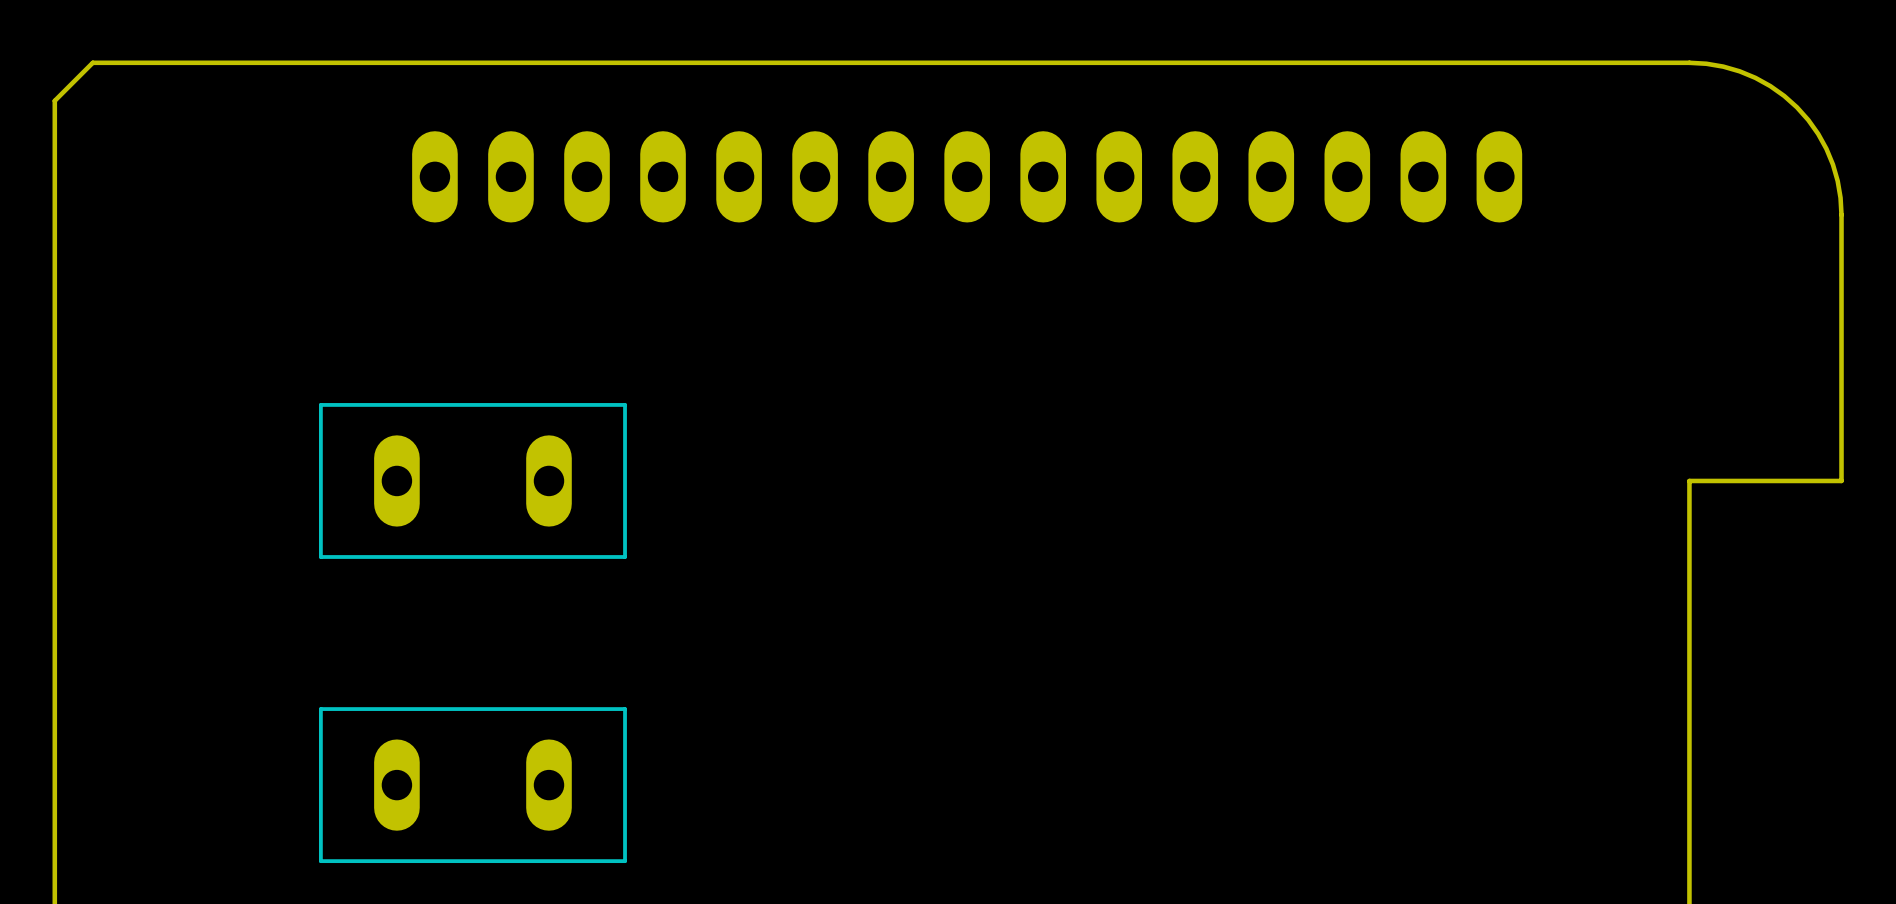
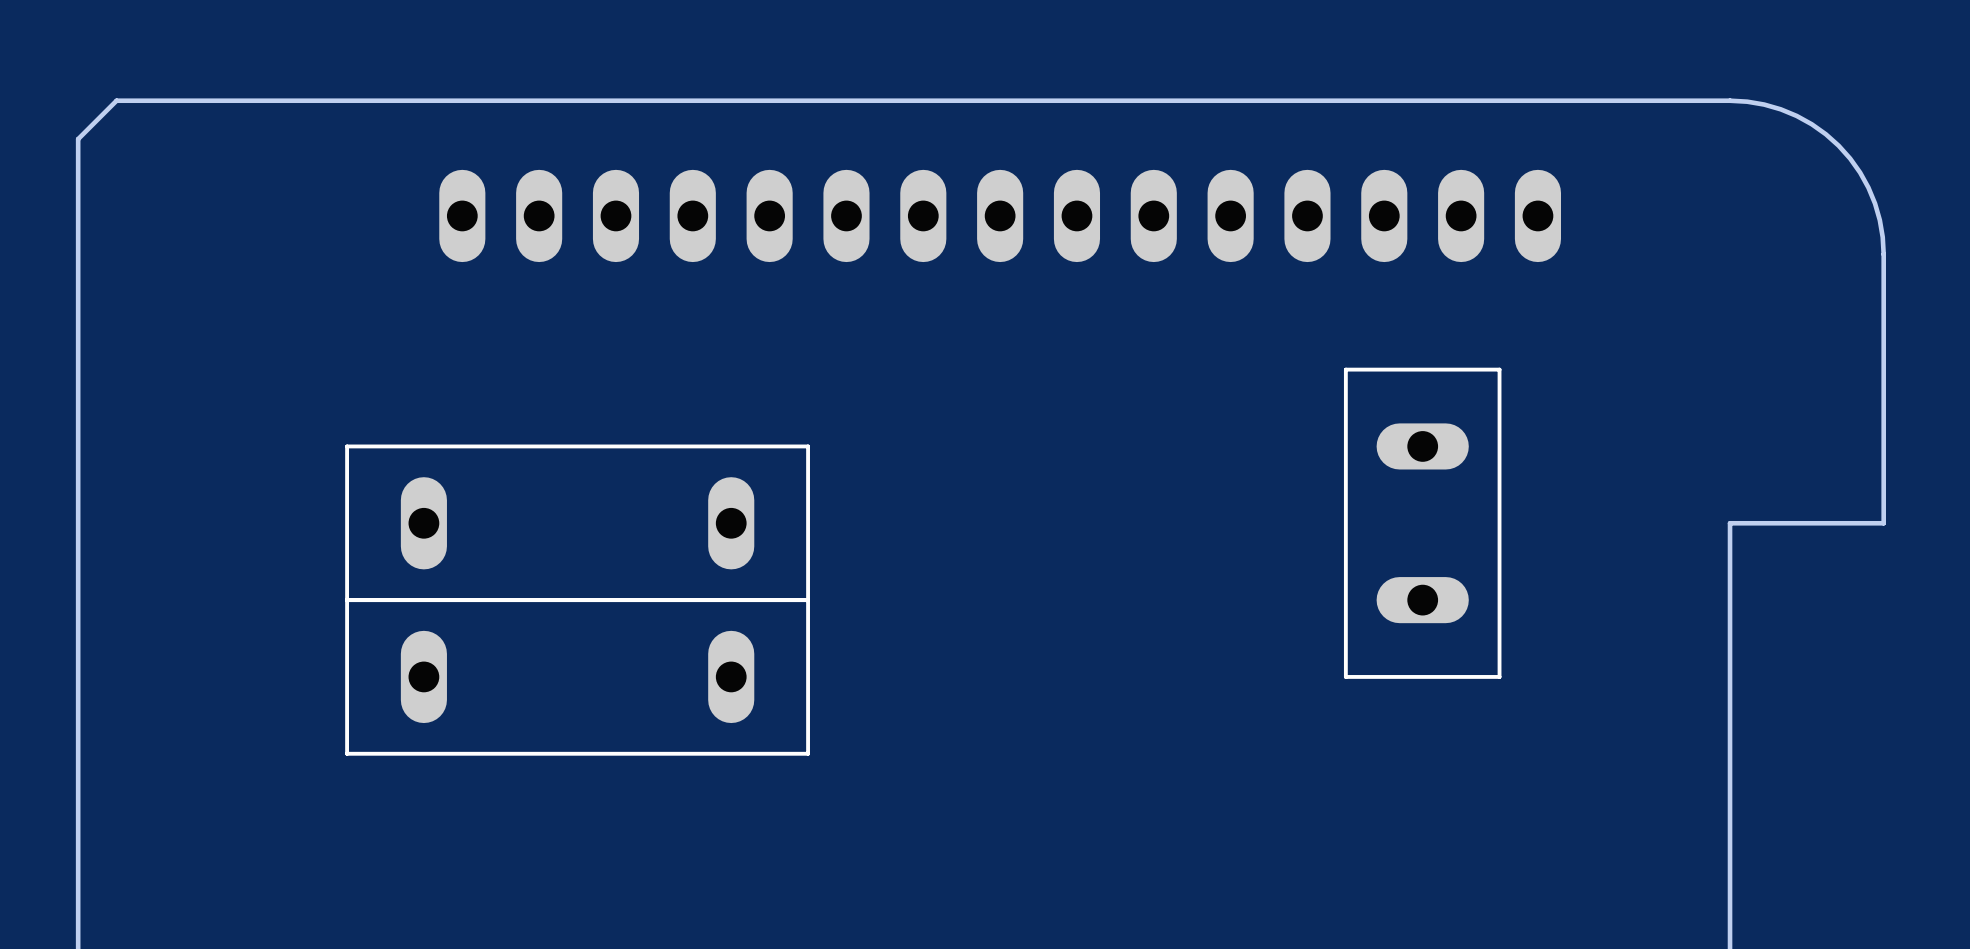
part: (472, 480) -> none
part: none -> (577, 523)
part: none -> (1422, 523)
part: none -> (577, 676)
part: (472, 785) -> none

